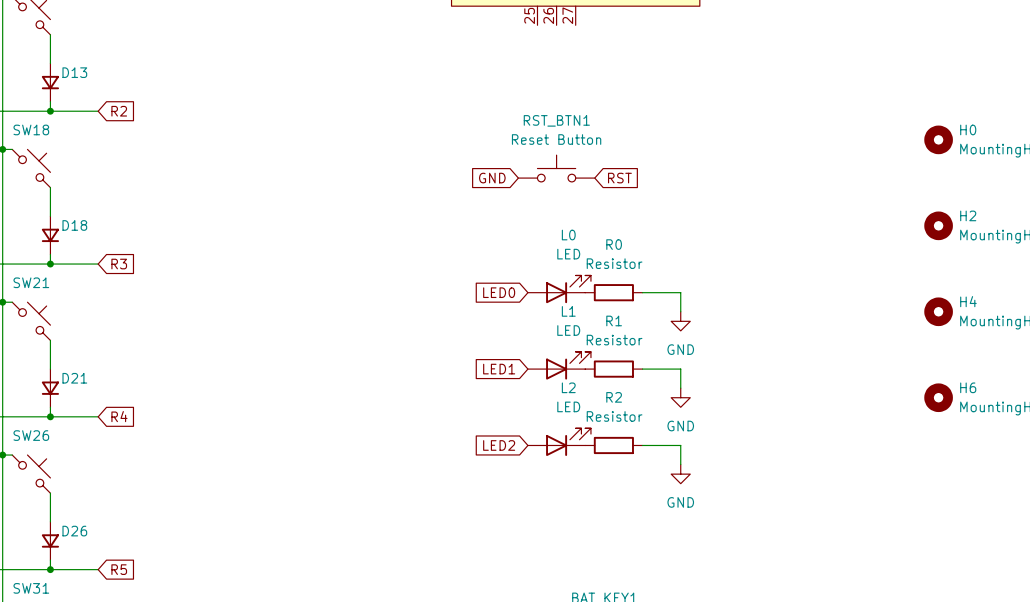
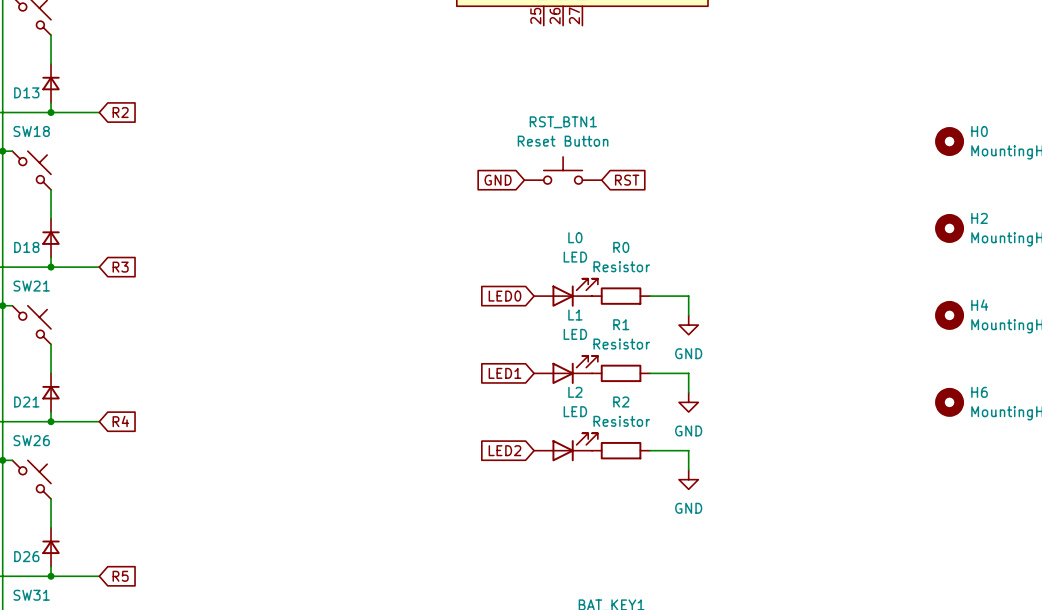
D13 rotation: 0° (50, 82) -> 180° (51, 83)
D18 rotation: 0° (50, 235) -> 180° (51, 238)
D21 rotation: 0° (50, 388) -> 180° (51, 392)
D26 rotation: 0° (50, 540) -> 180° (51, 547)

